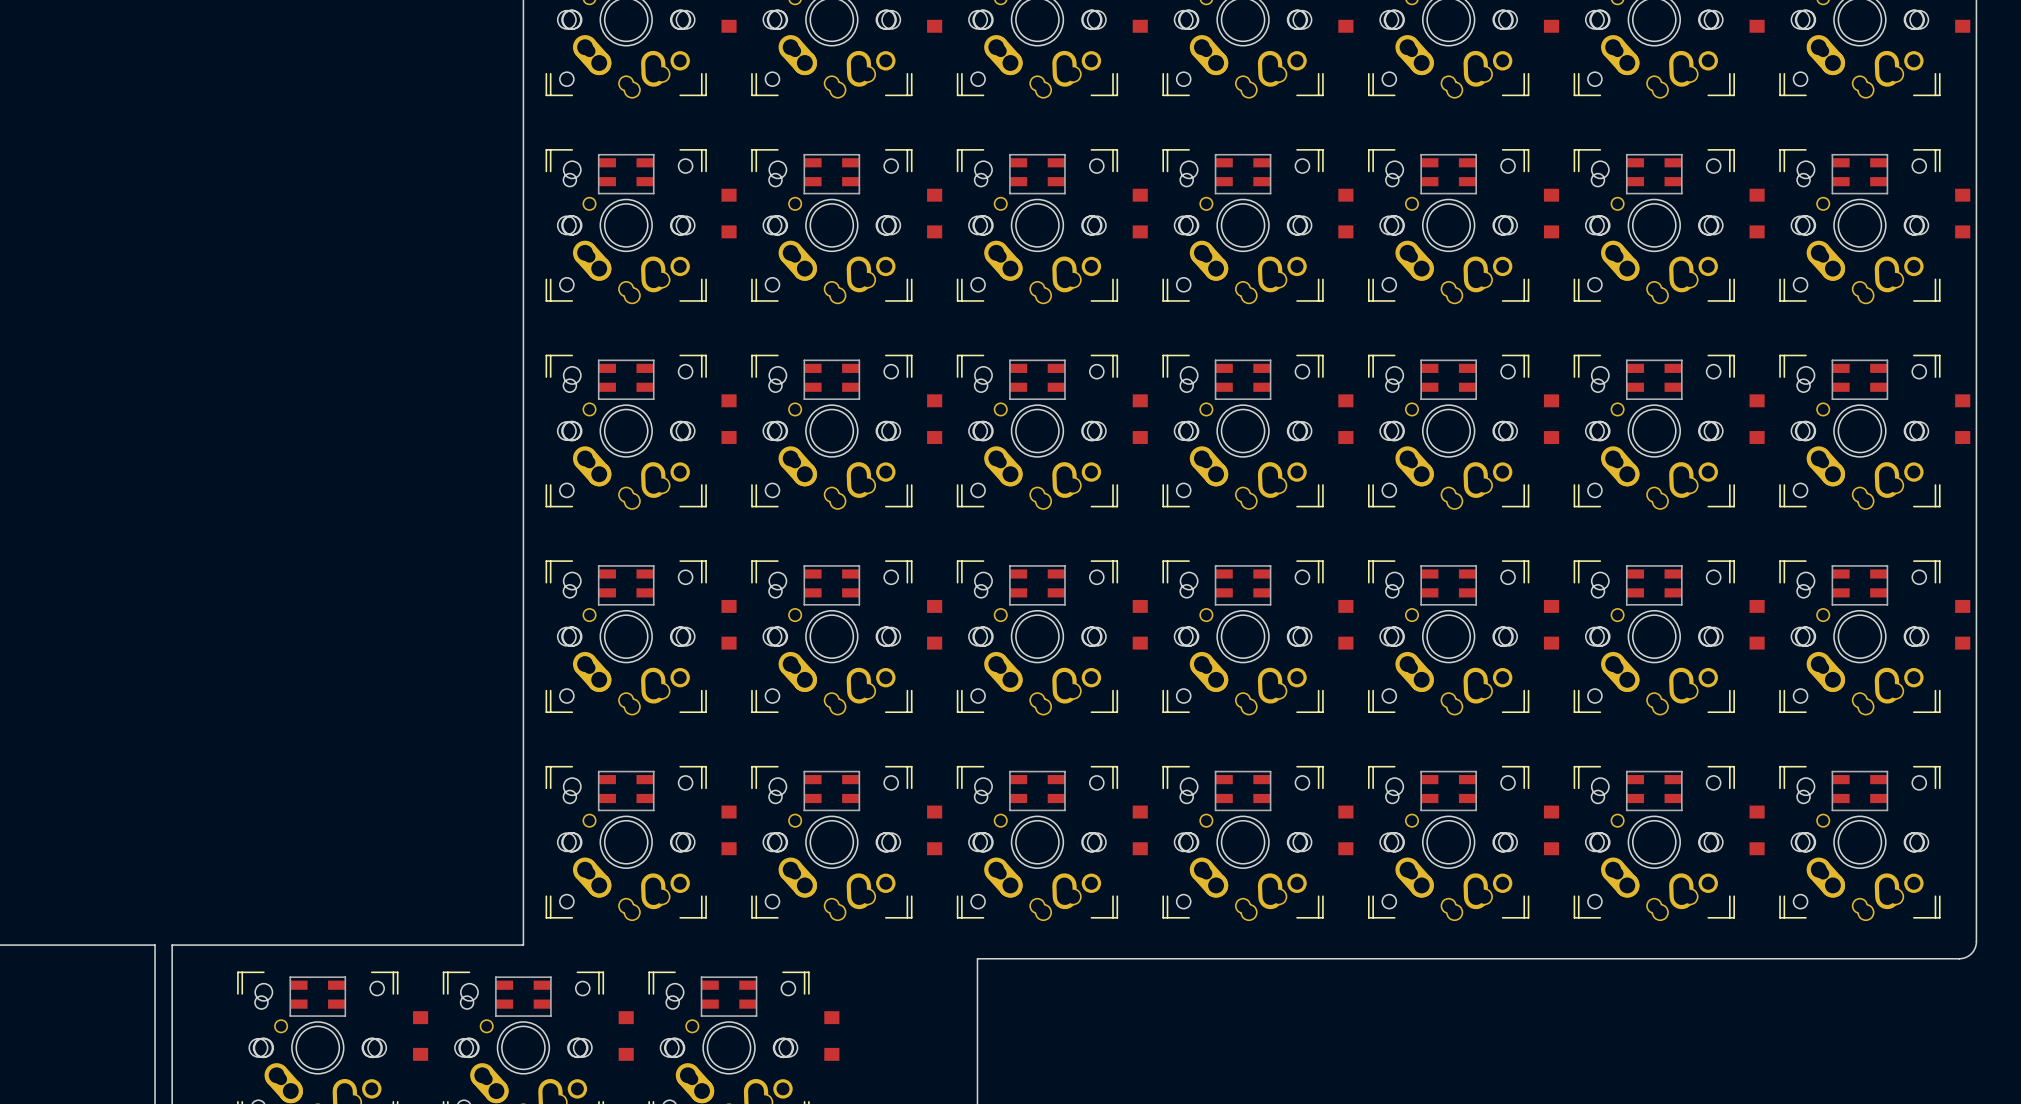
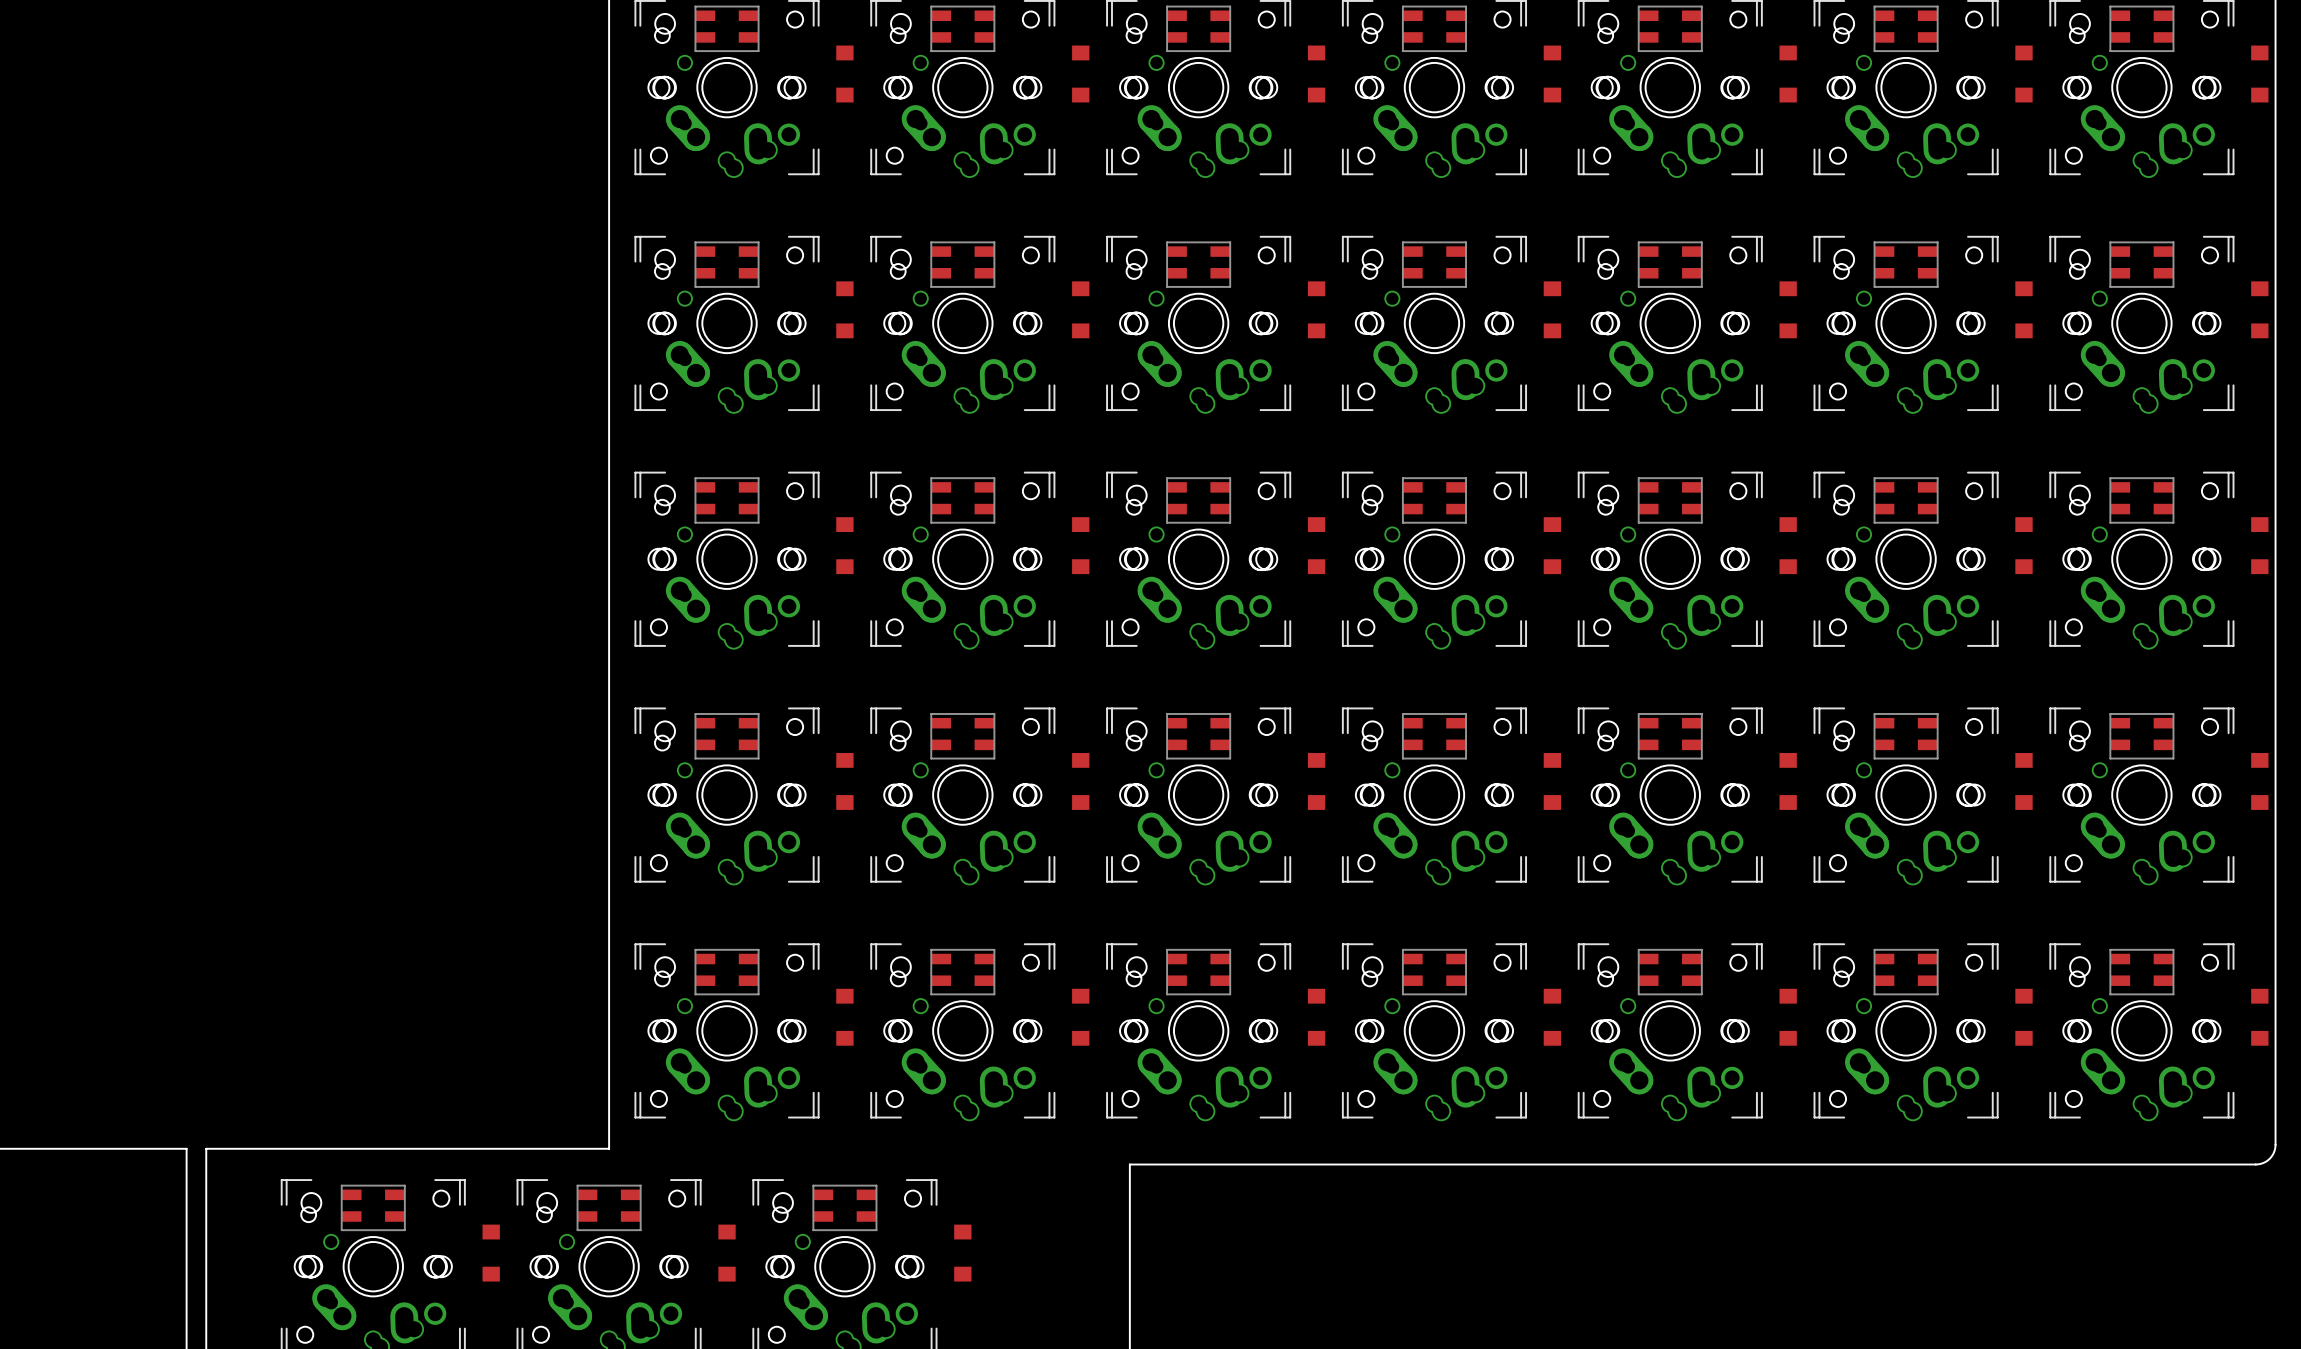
part: none -> (2259, 1017)

